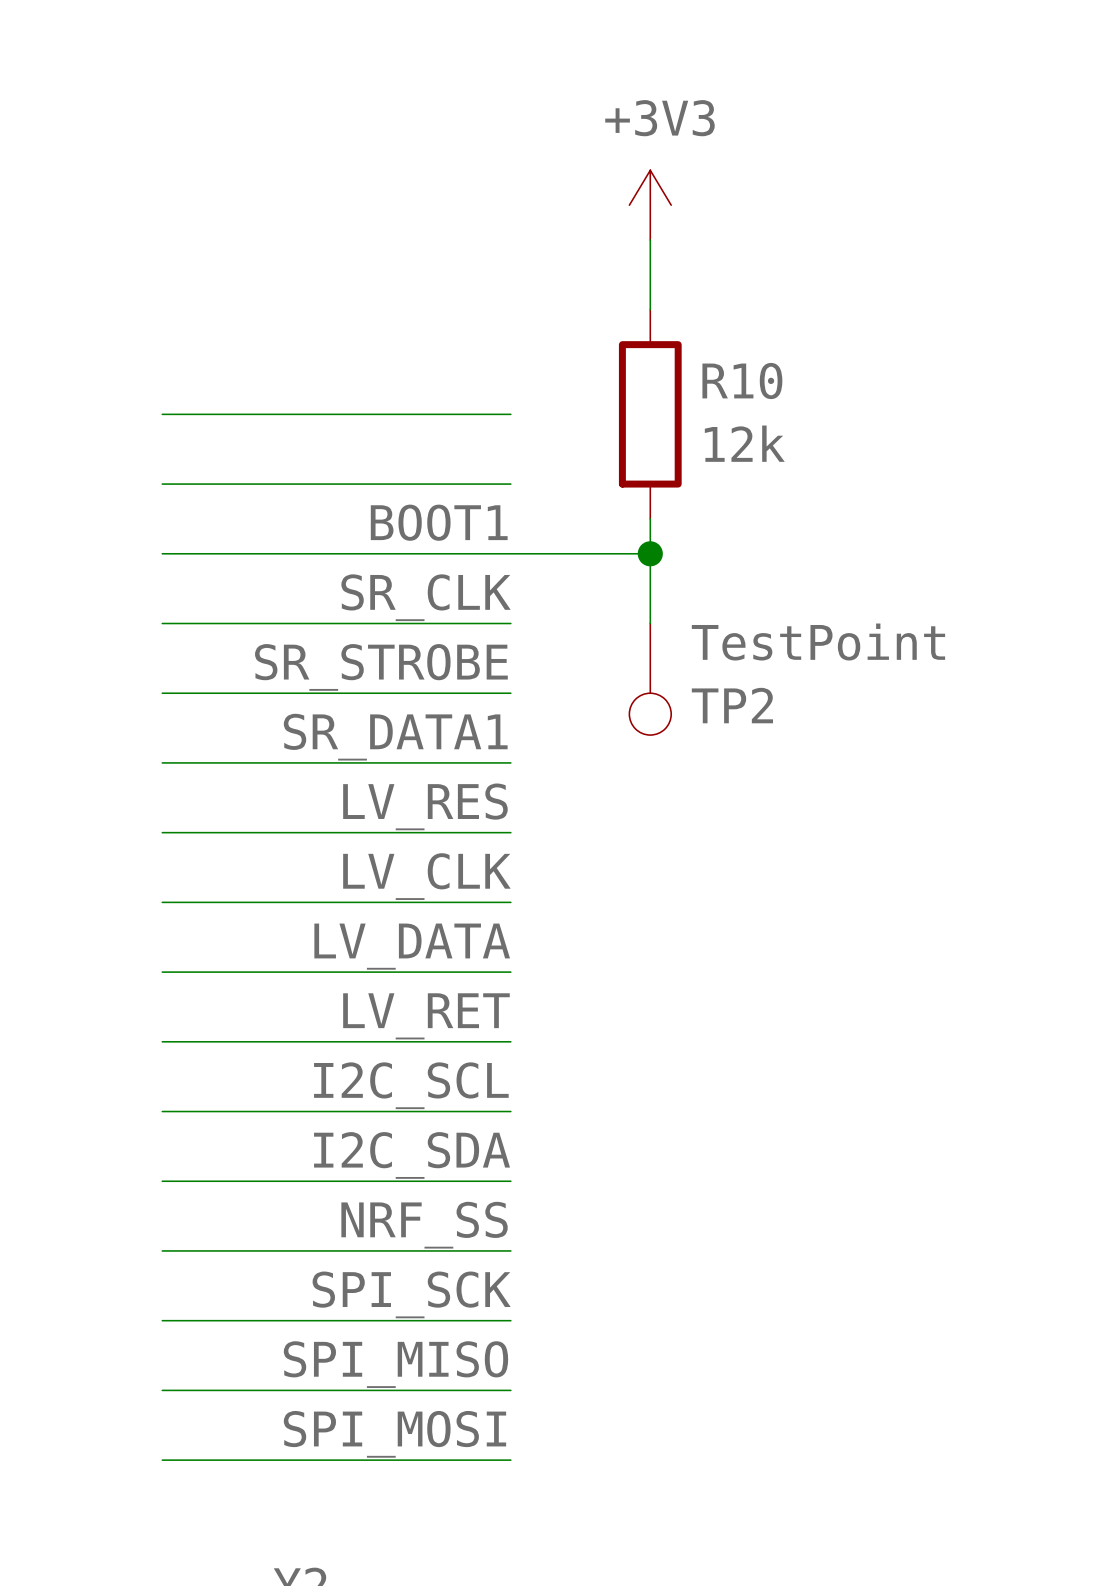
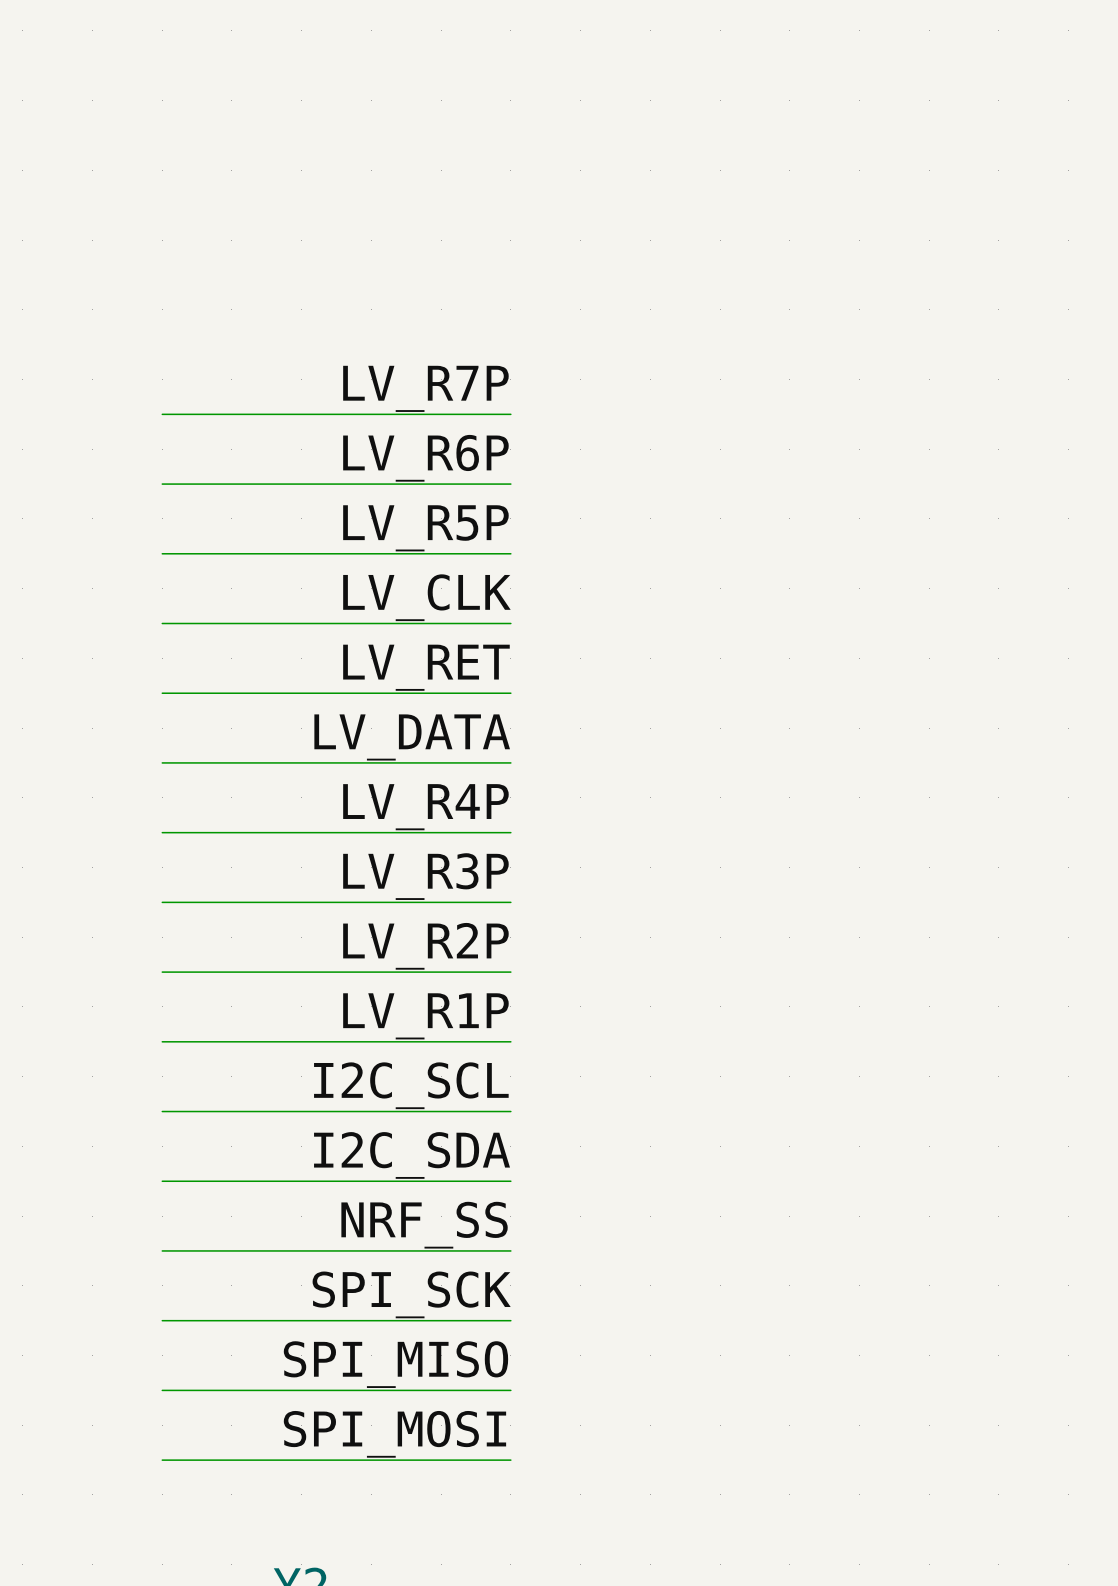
power symbol: +3V3 (650, 205) -> none
wire: (650, 240) (650, 309) -> none
label: none -> LV_R7P (425, 388)
R10: 12k (650, 414) -> none
label: none -> LV_R6P (425, 458)
wire: (650, 518) (650, 623) -> none
label: BOOT1 (439, 522) -> LV_R5P (425, 528)
wire: (510, 553) (650, 553) -> none
junction: (650, 553) -> none
label: SR_CLK (426, 597) -> LV_CLK (426, 597)
label: SR_STROBE (381, 667) -> LV_RET (426, 667)
TP2: TestPoint (650, 679) -> none
label: SR_DATA1 (395, 737) -> LV_DATA (412, 737)
label: LV_RES (425, 806) -> LV_R4P (425, 807)
label: LV_CLK (426, 876) -> LV_R3P (425, 876)
label: LV_DATA (412, 946) -> LV_R2P (425, 946)
label: LV_RET (426, 1016) -> LV_R1P (425, 1016)

